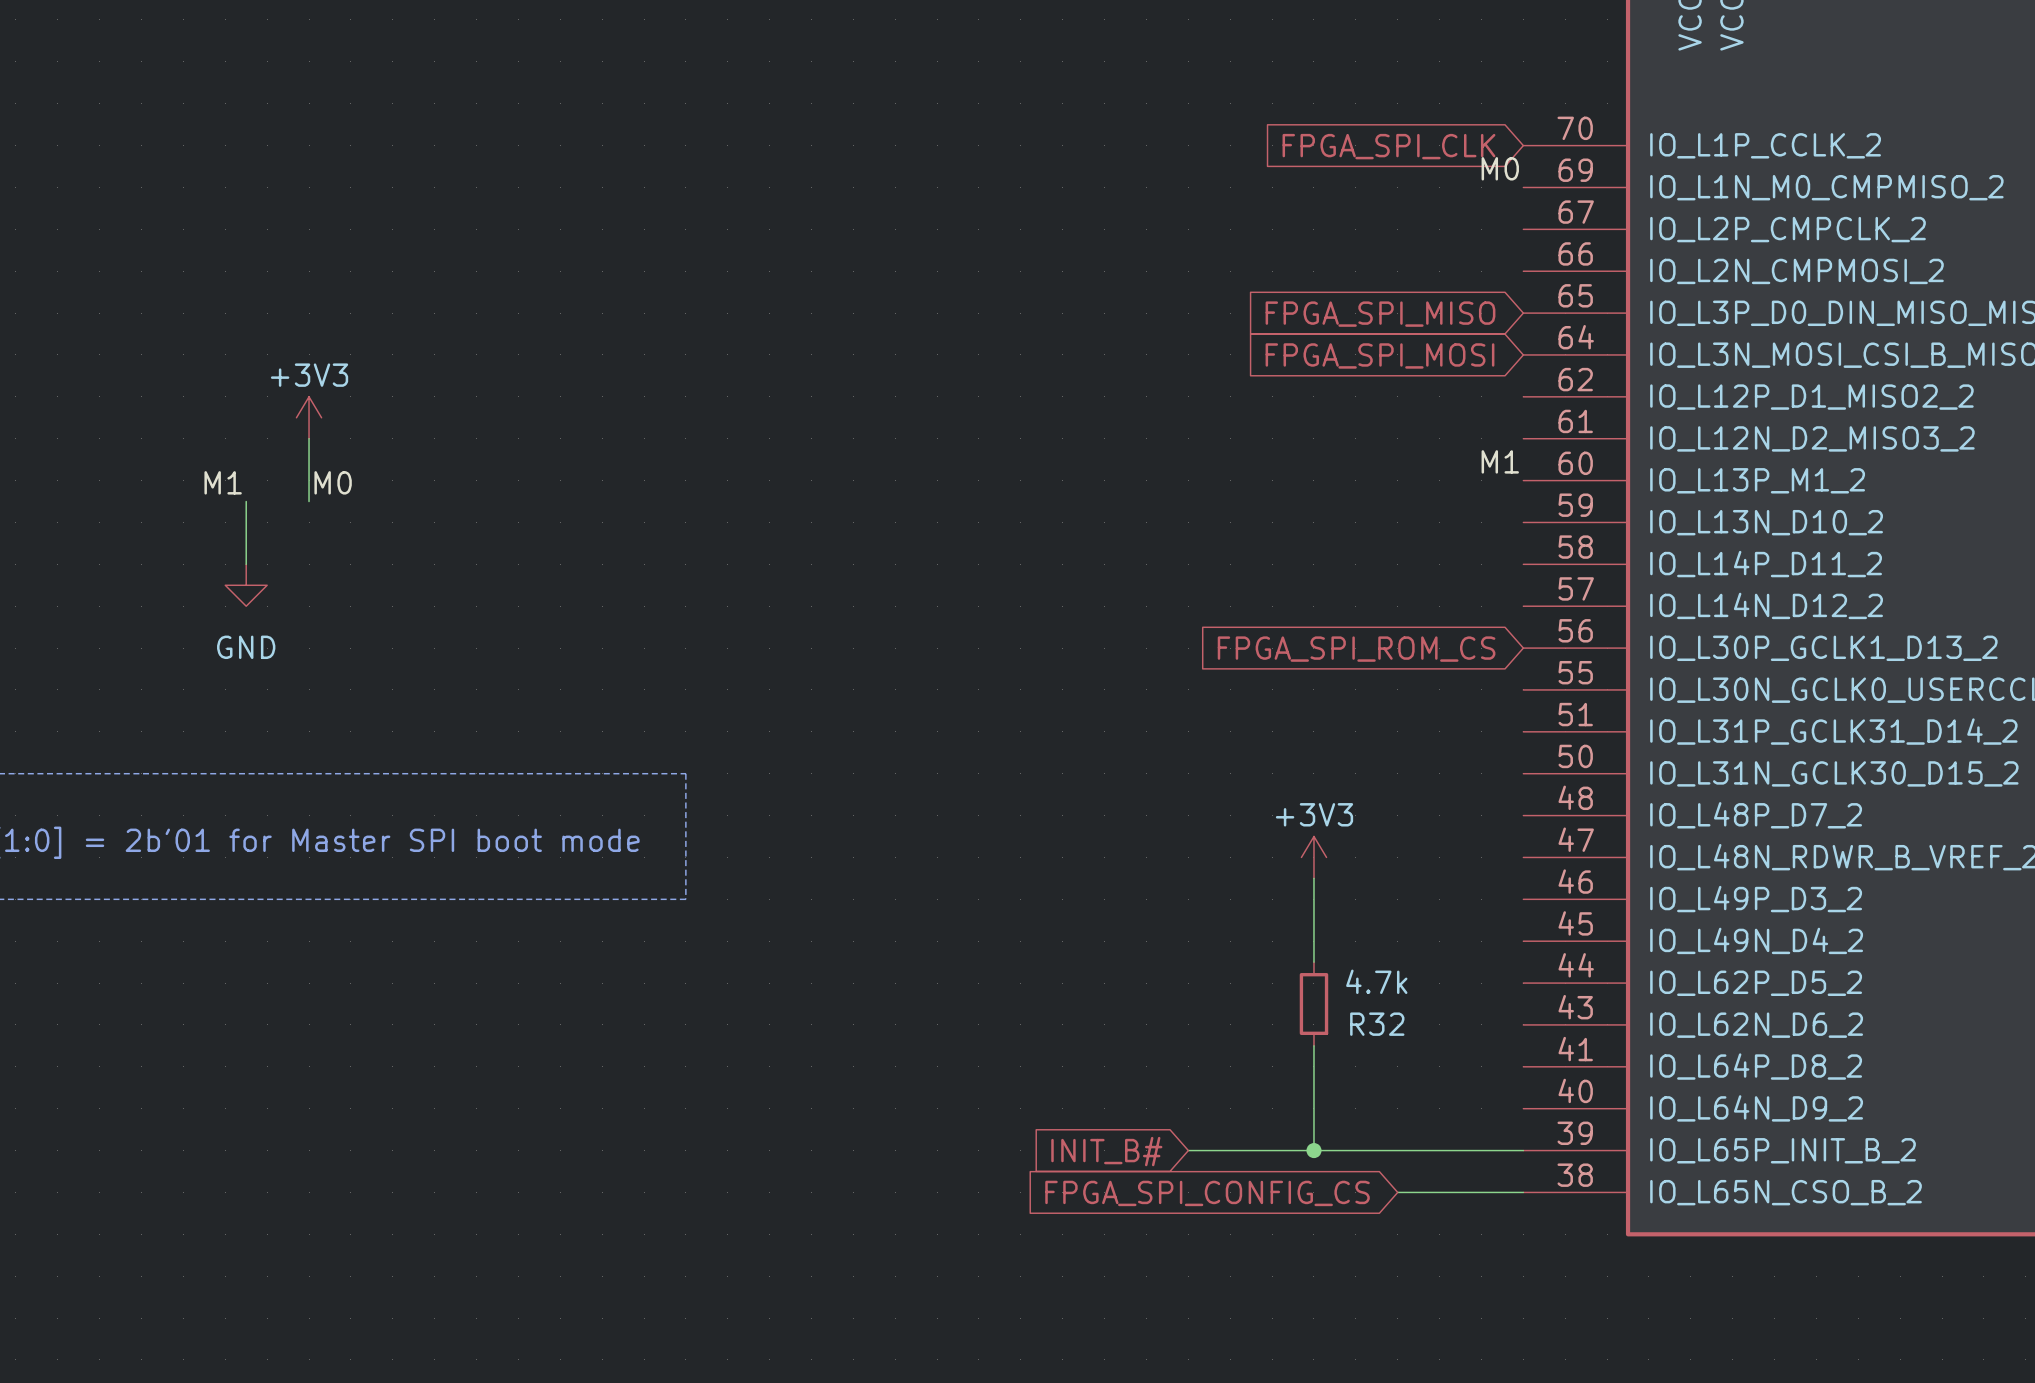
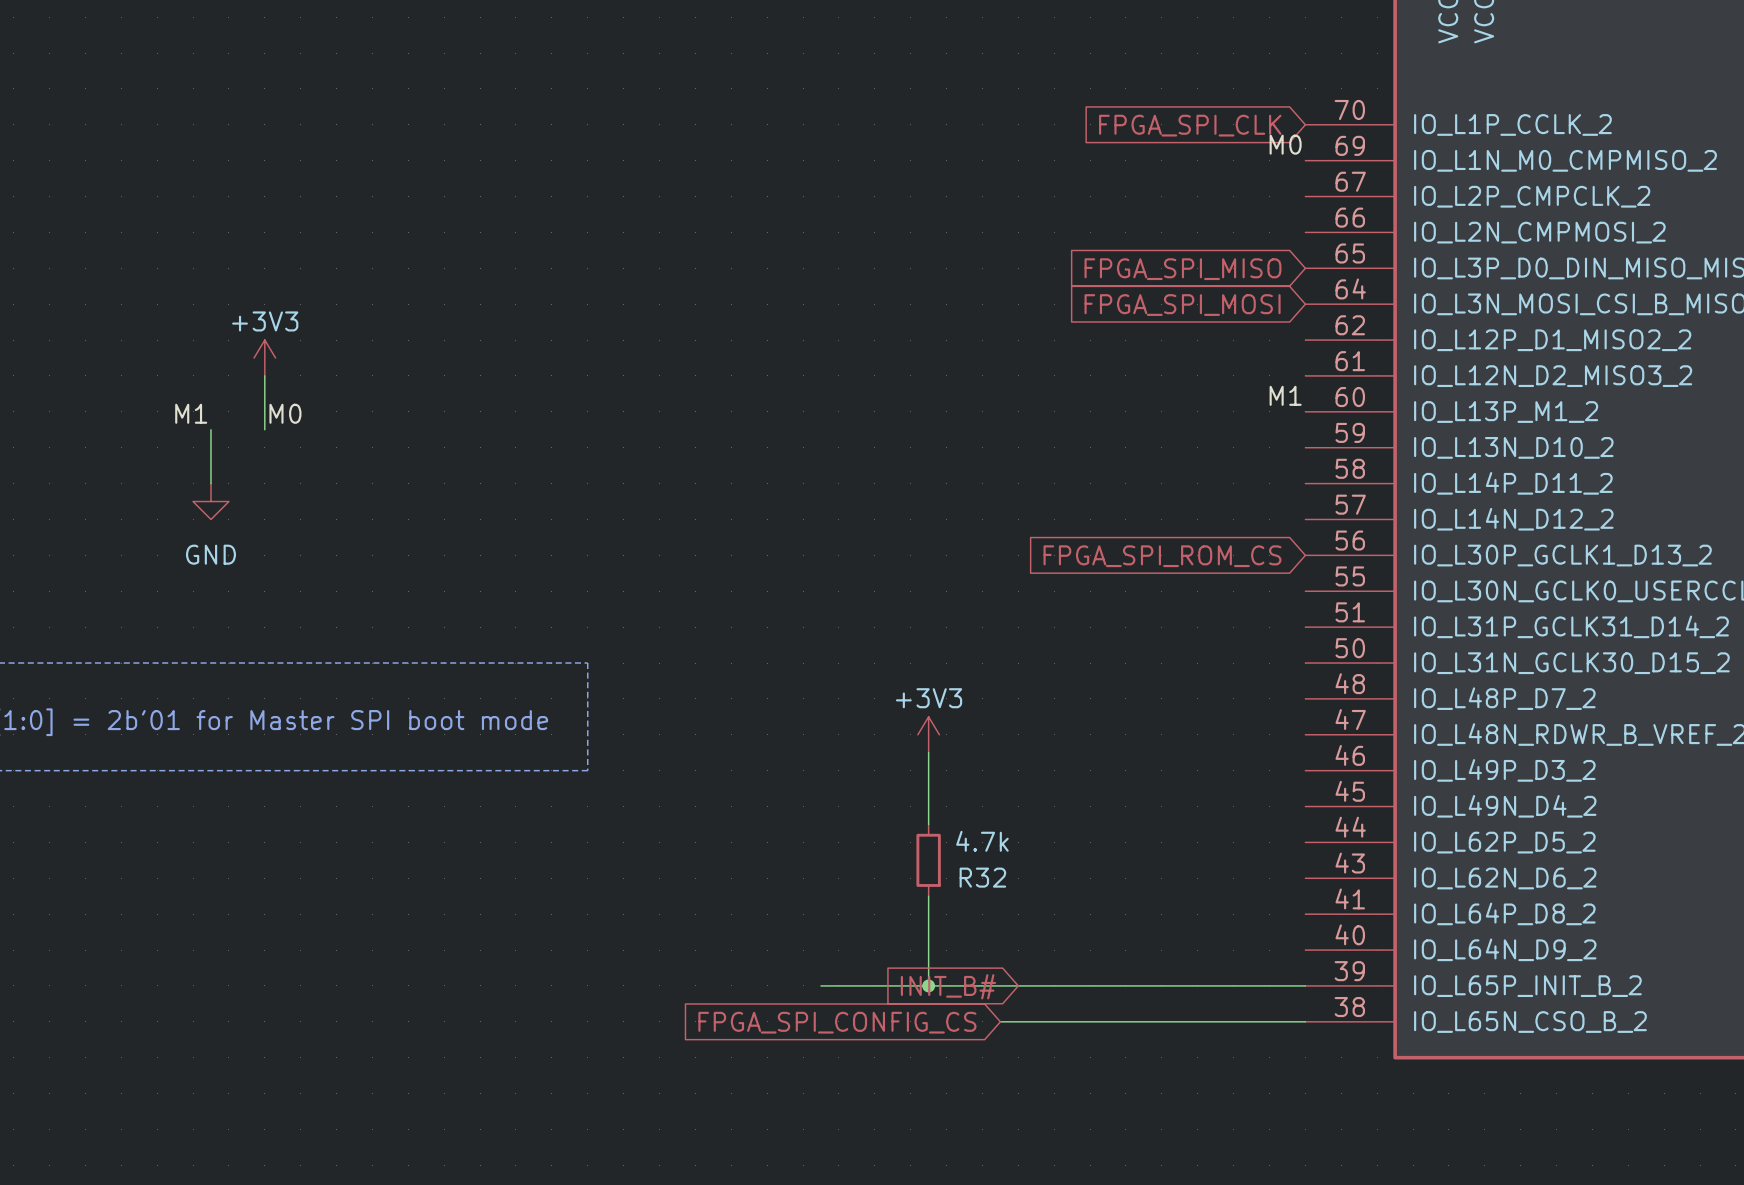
power symbol position: +3V3 (1313, 857) -> +3V3 (928, 734)
wire: (1313, 878) (1313, 962) -> (928, 752) (928, 824)
R32 position: (1313, 1004) -> (928, 860)
wire: (1313, 1045) (1313, 1150) -> (928, 896) (928, 985)
wire: none -> (820, 985) (1018, 985)
junction: none -> (928, 985)
junction: (1313, 1150) -> none
wire: none -> (1000, 1021) (1197, 1021)
global label position: FPGA_SPI_CONFIG_CS (1207, 1193) -> FPGA_SPI_CONFIG_CS (837, 1022)

